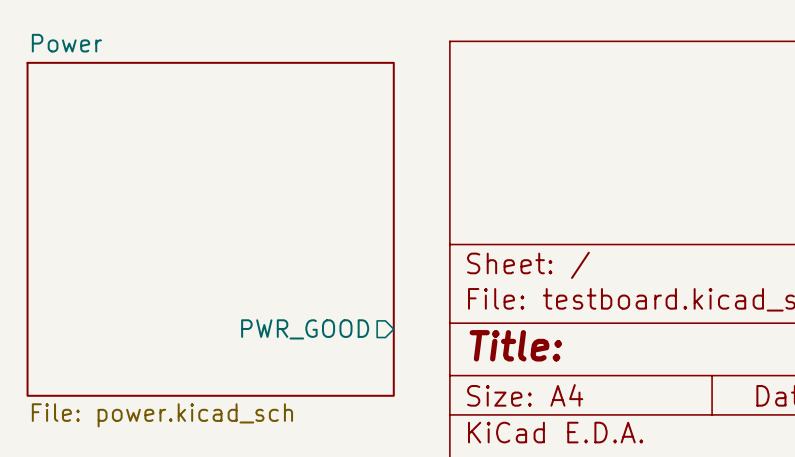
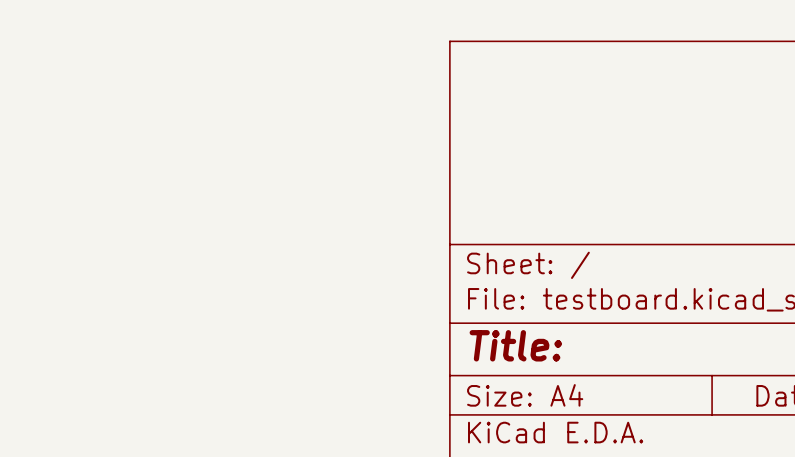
sheet Power: File: power.kicad_sch (210, 229) -> none
sheet pin: PWR_GOOD (305, 329) -> none

